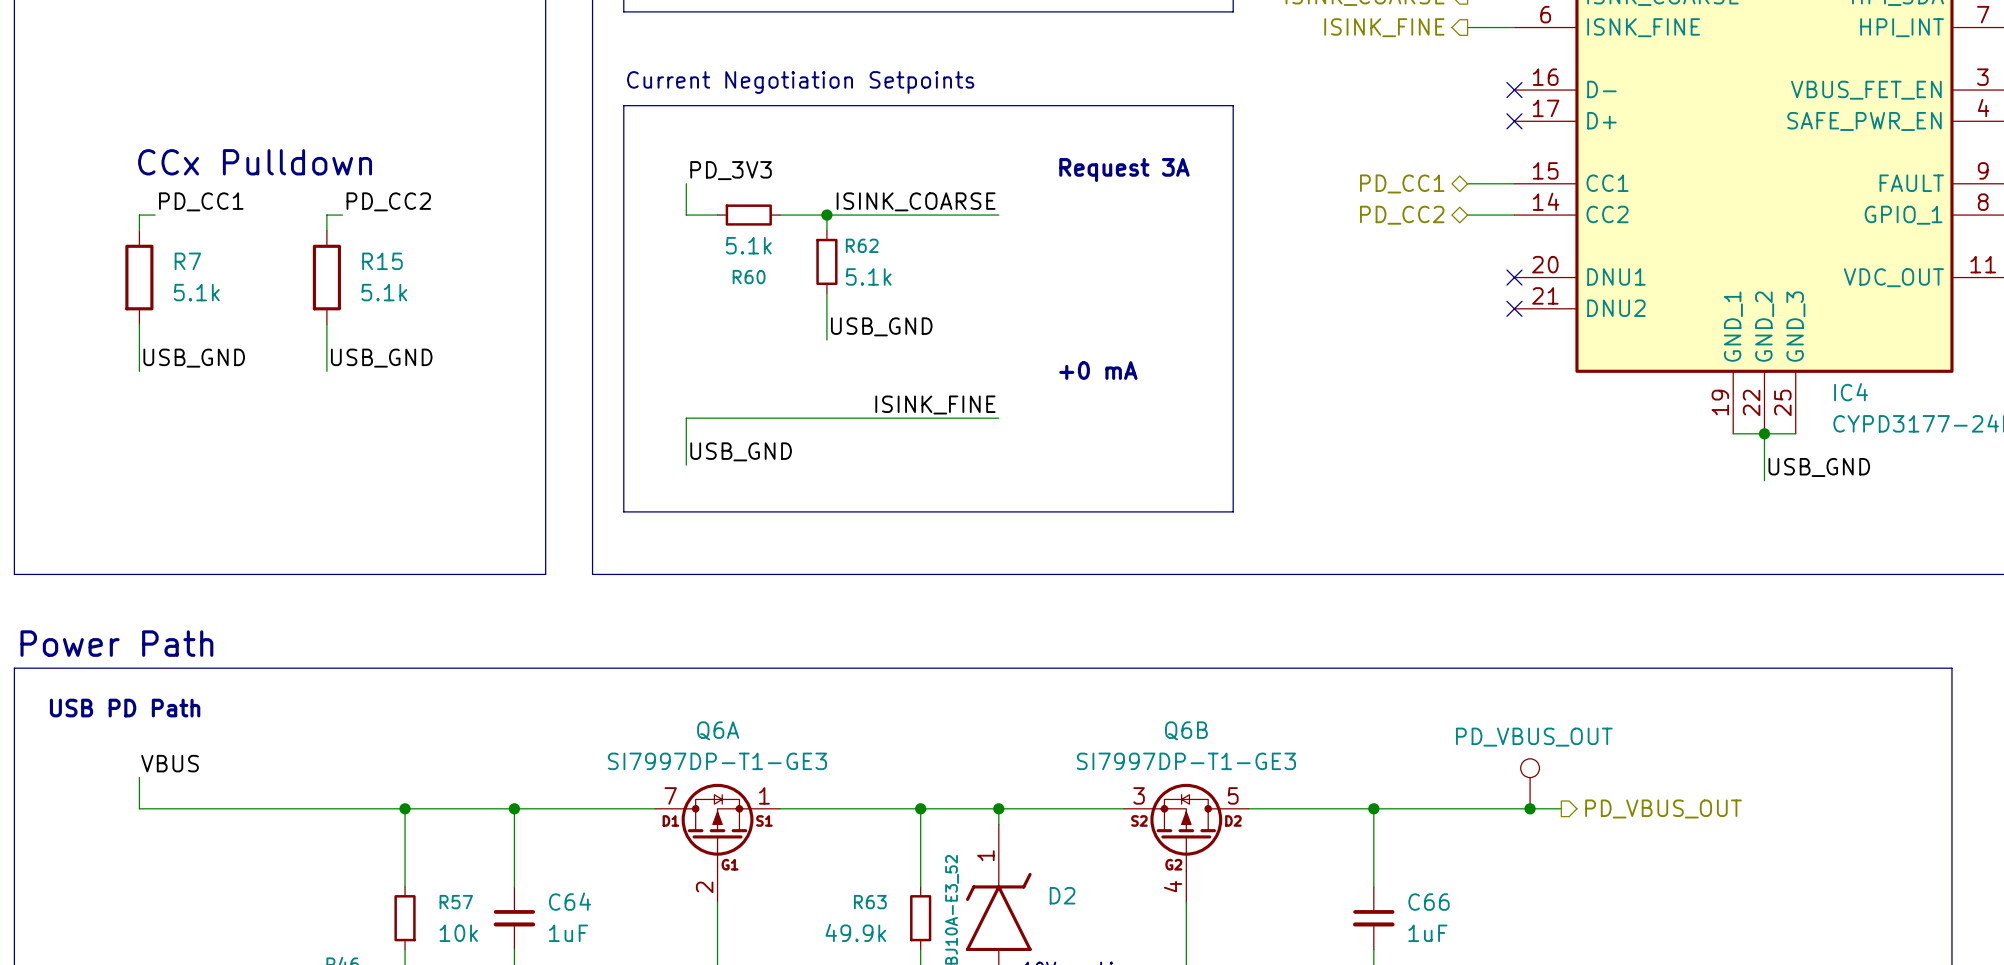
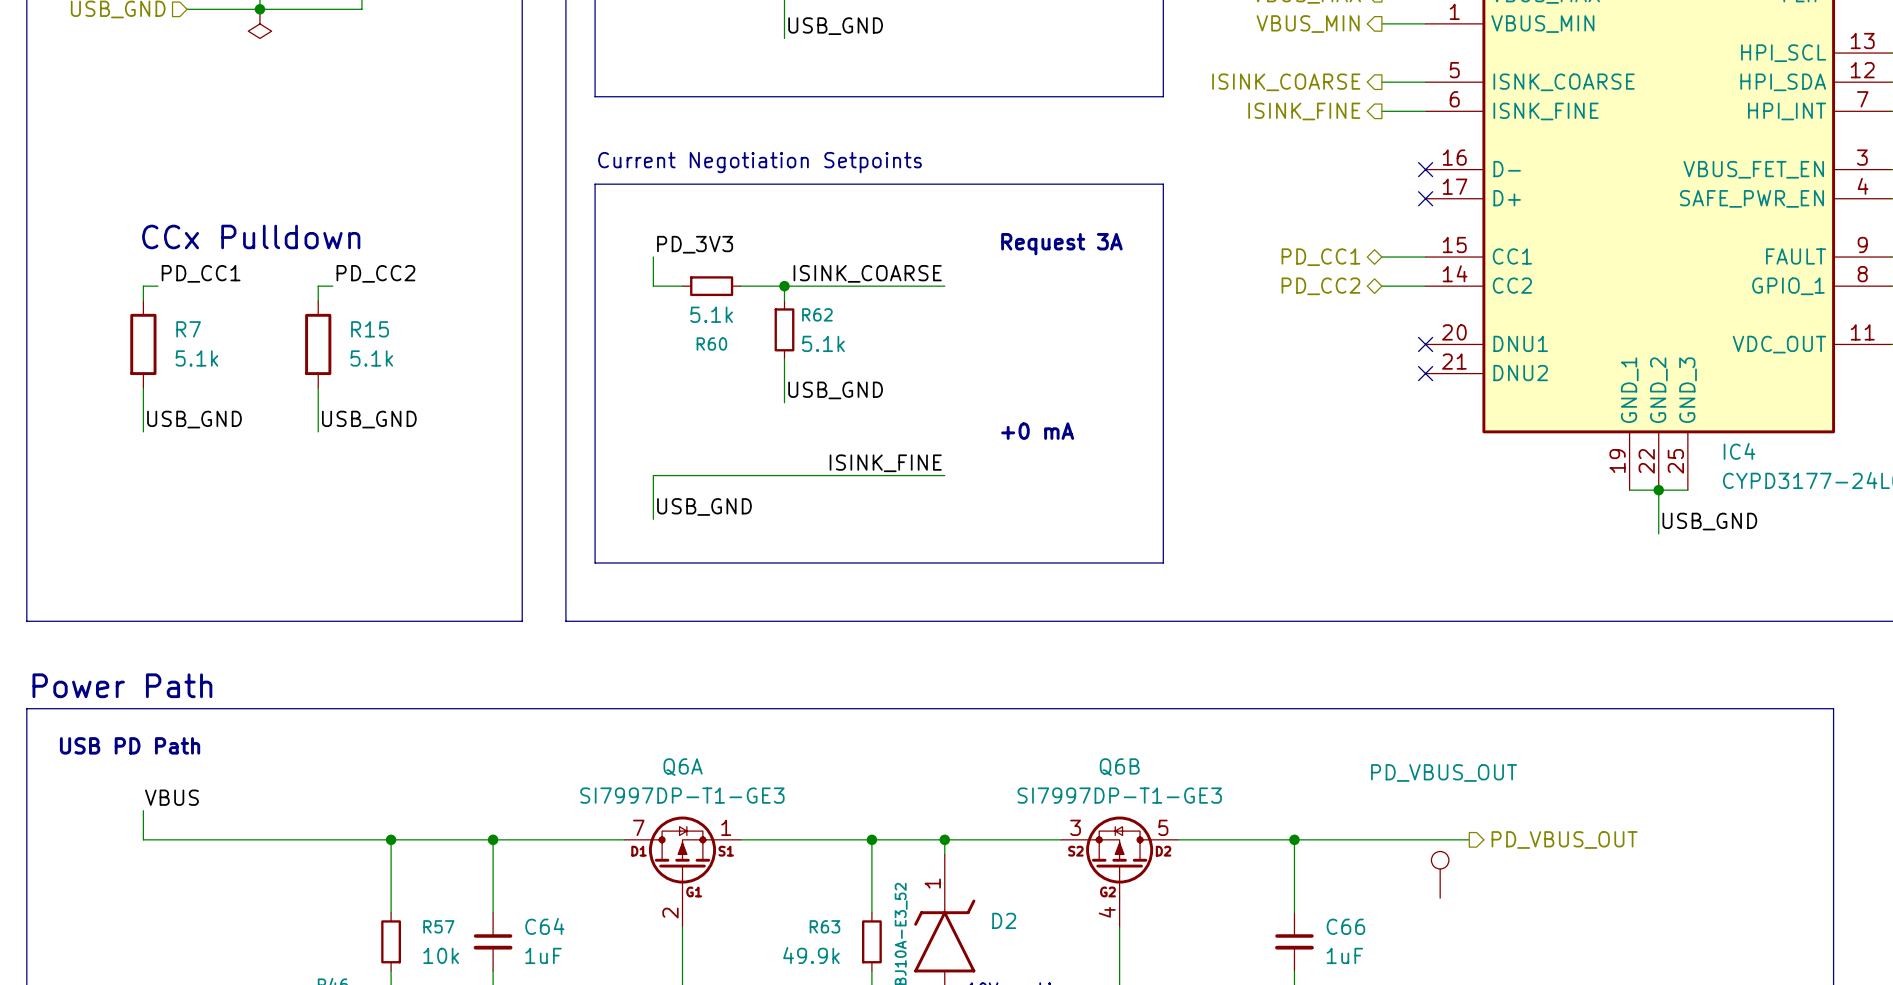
part position: (1530, 783) -> (1440, 874)
junction: (1530, 808) -> none

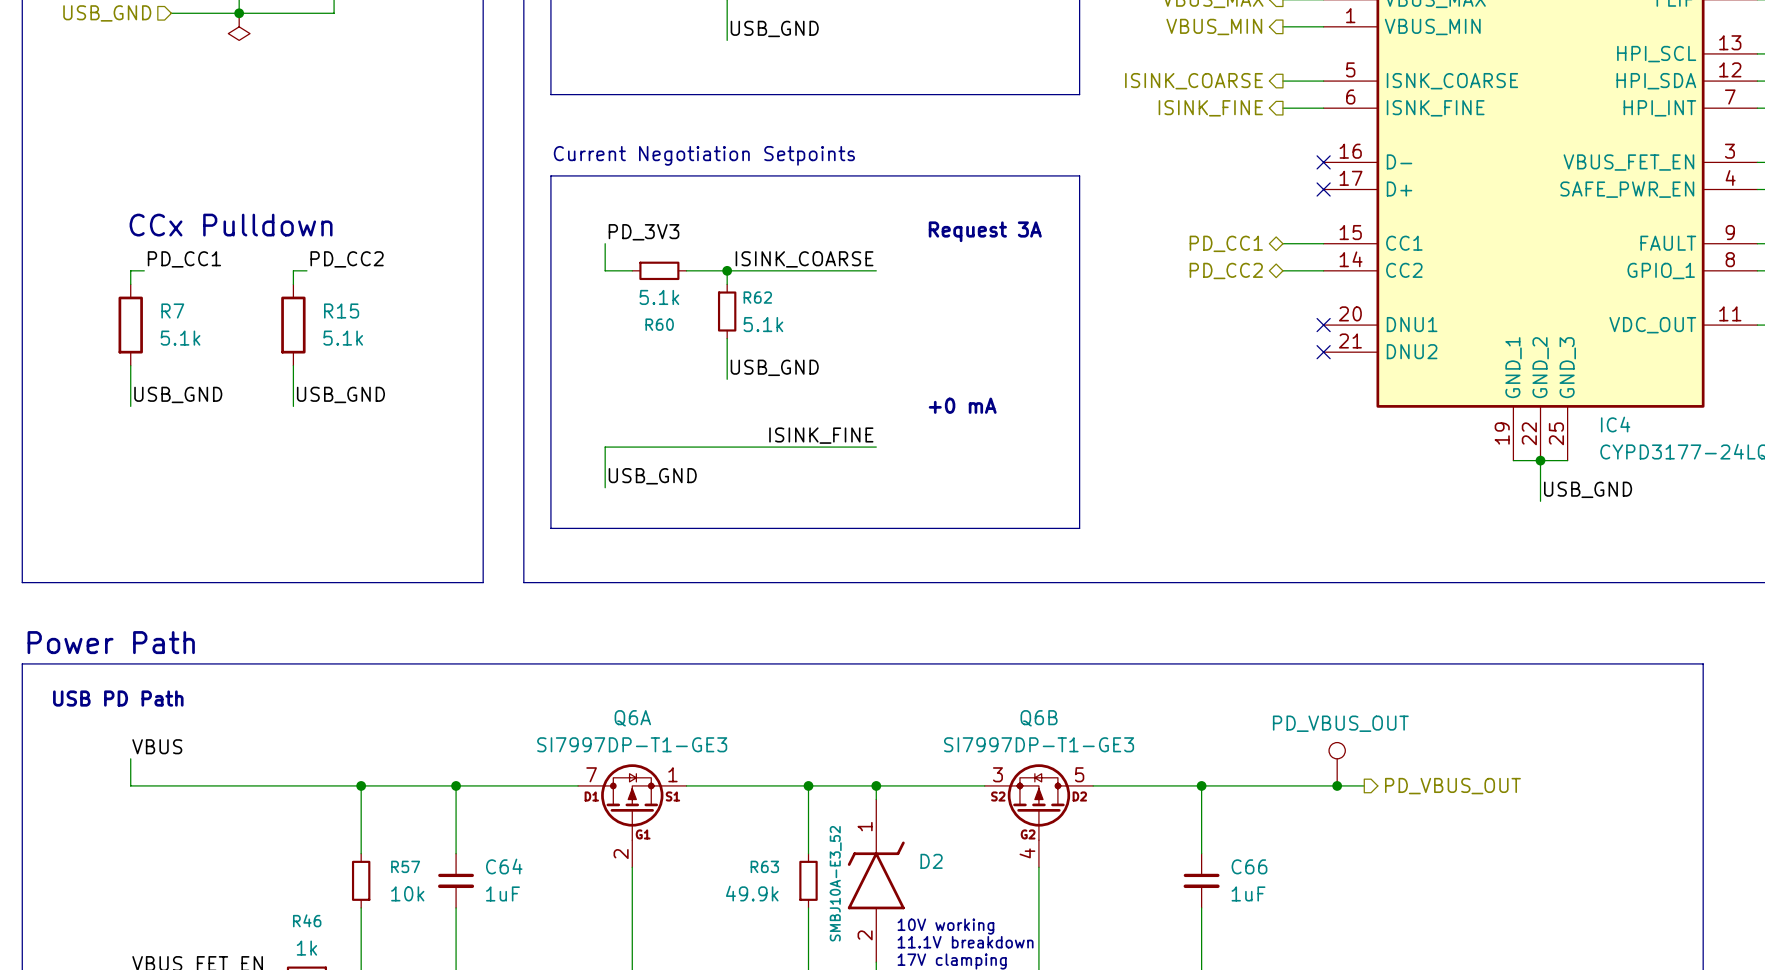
junction: none -> (1337, 785)
part position: (1440, 874) -> (1337, 764)

